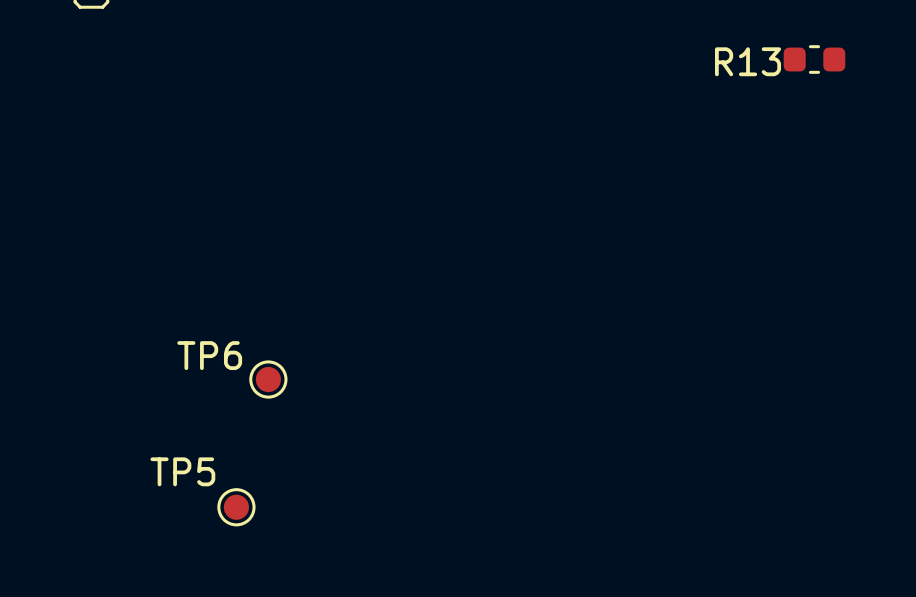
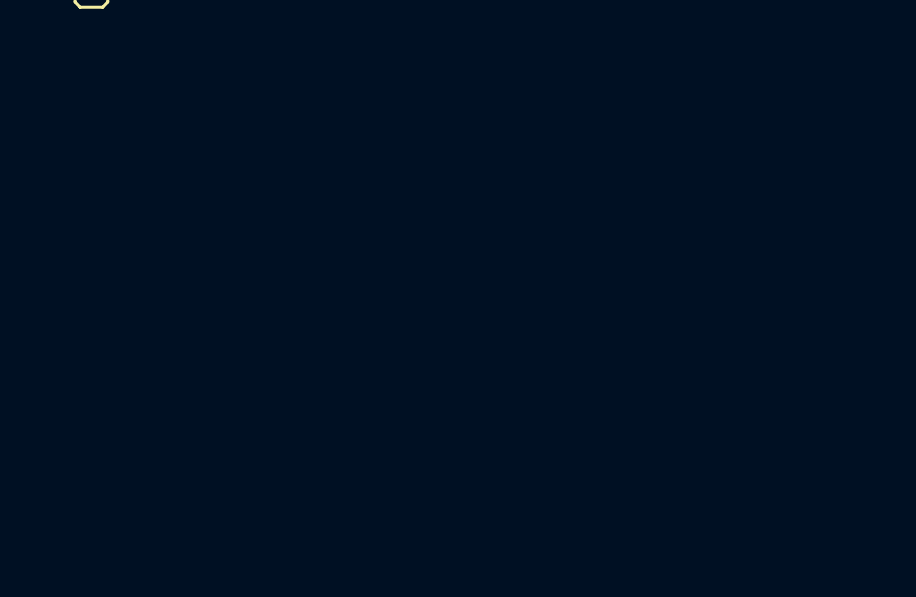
R13: (814, 59) -> none
TP6: (268, 379) -> none
TP5: (236, 507) -> none

